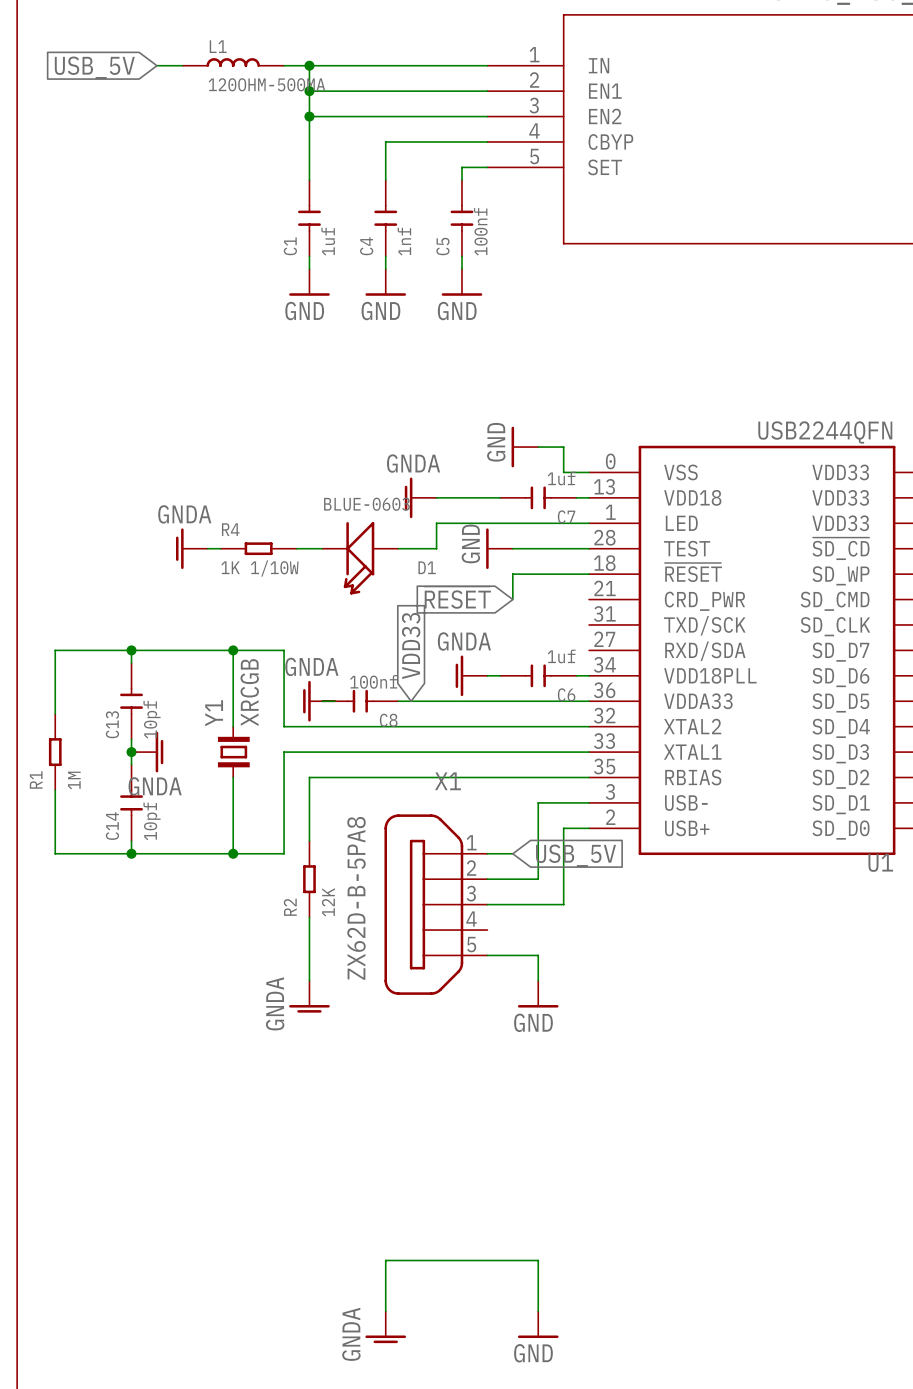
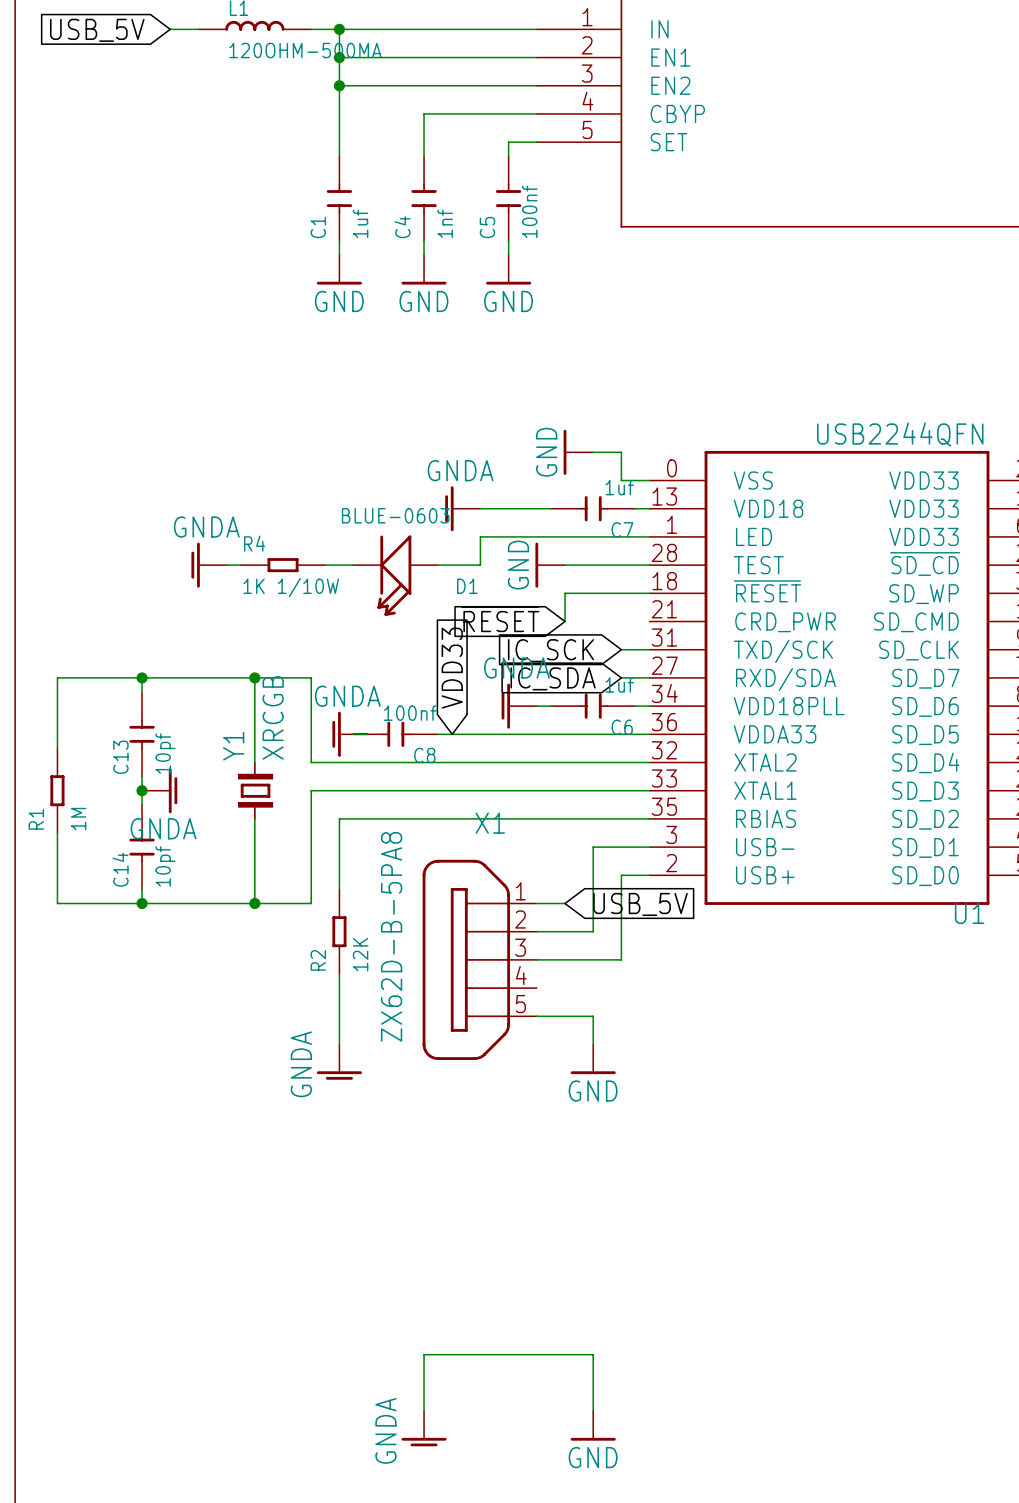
wire: none -> (621, 649) (649, 649)
global label: none -> IC_SCK (551, 650)
wire: none -> (621, 677) (649, 677)
global label: none -> IC_SDA (553, 678)

